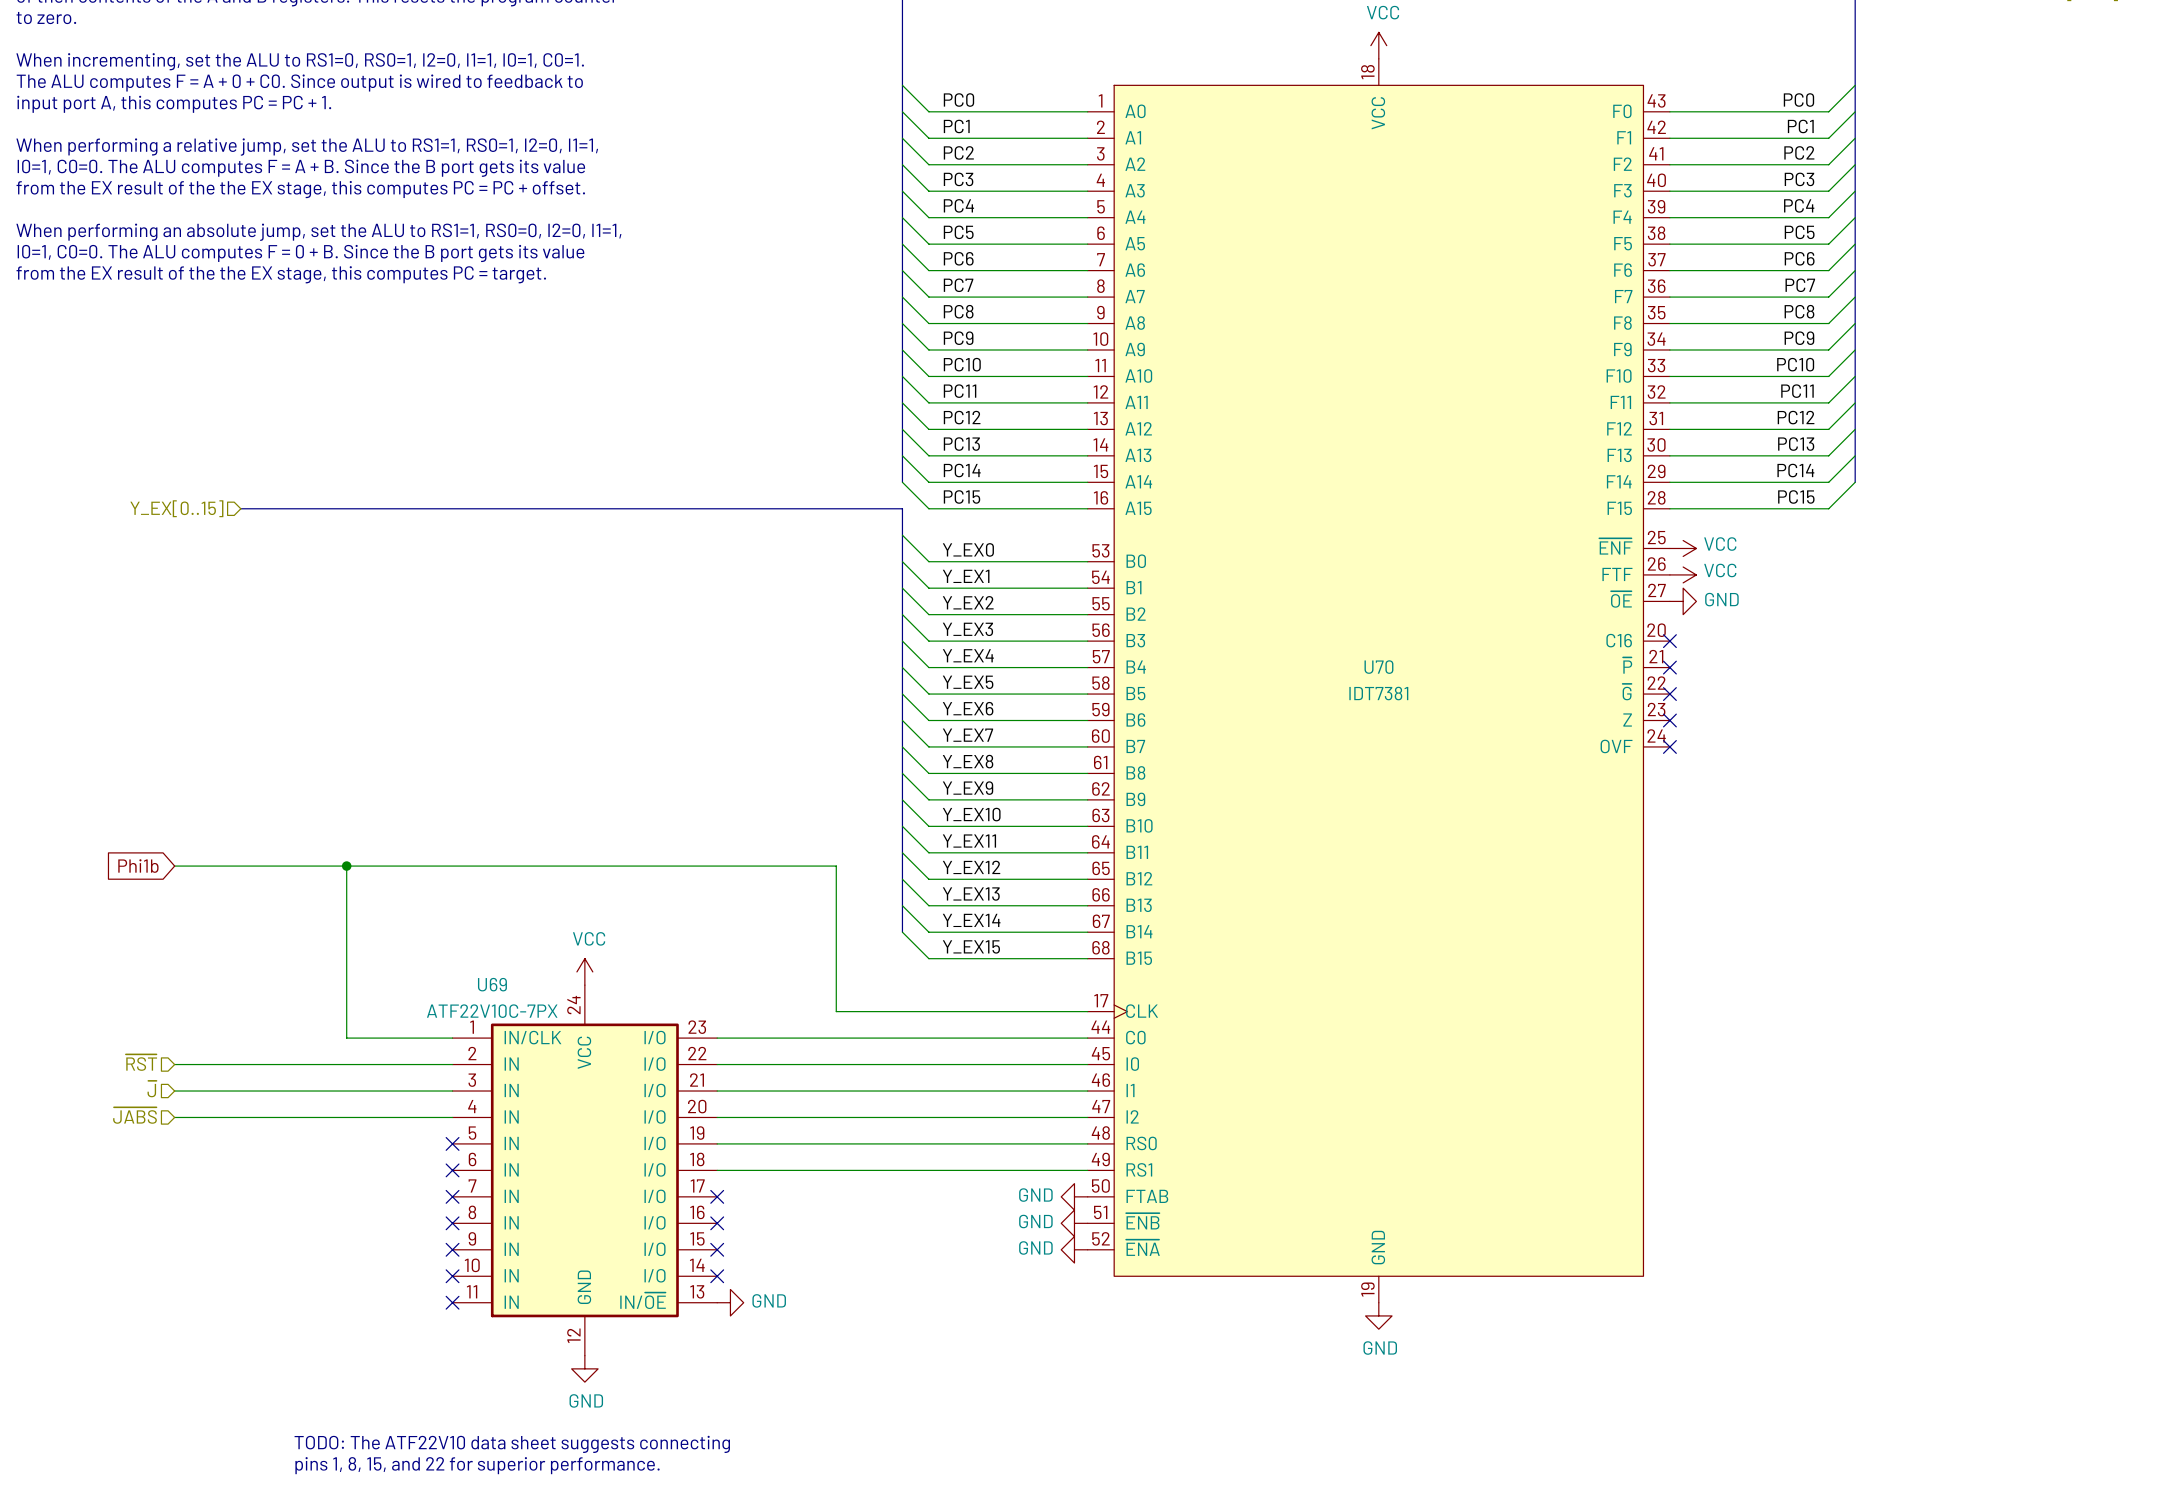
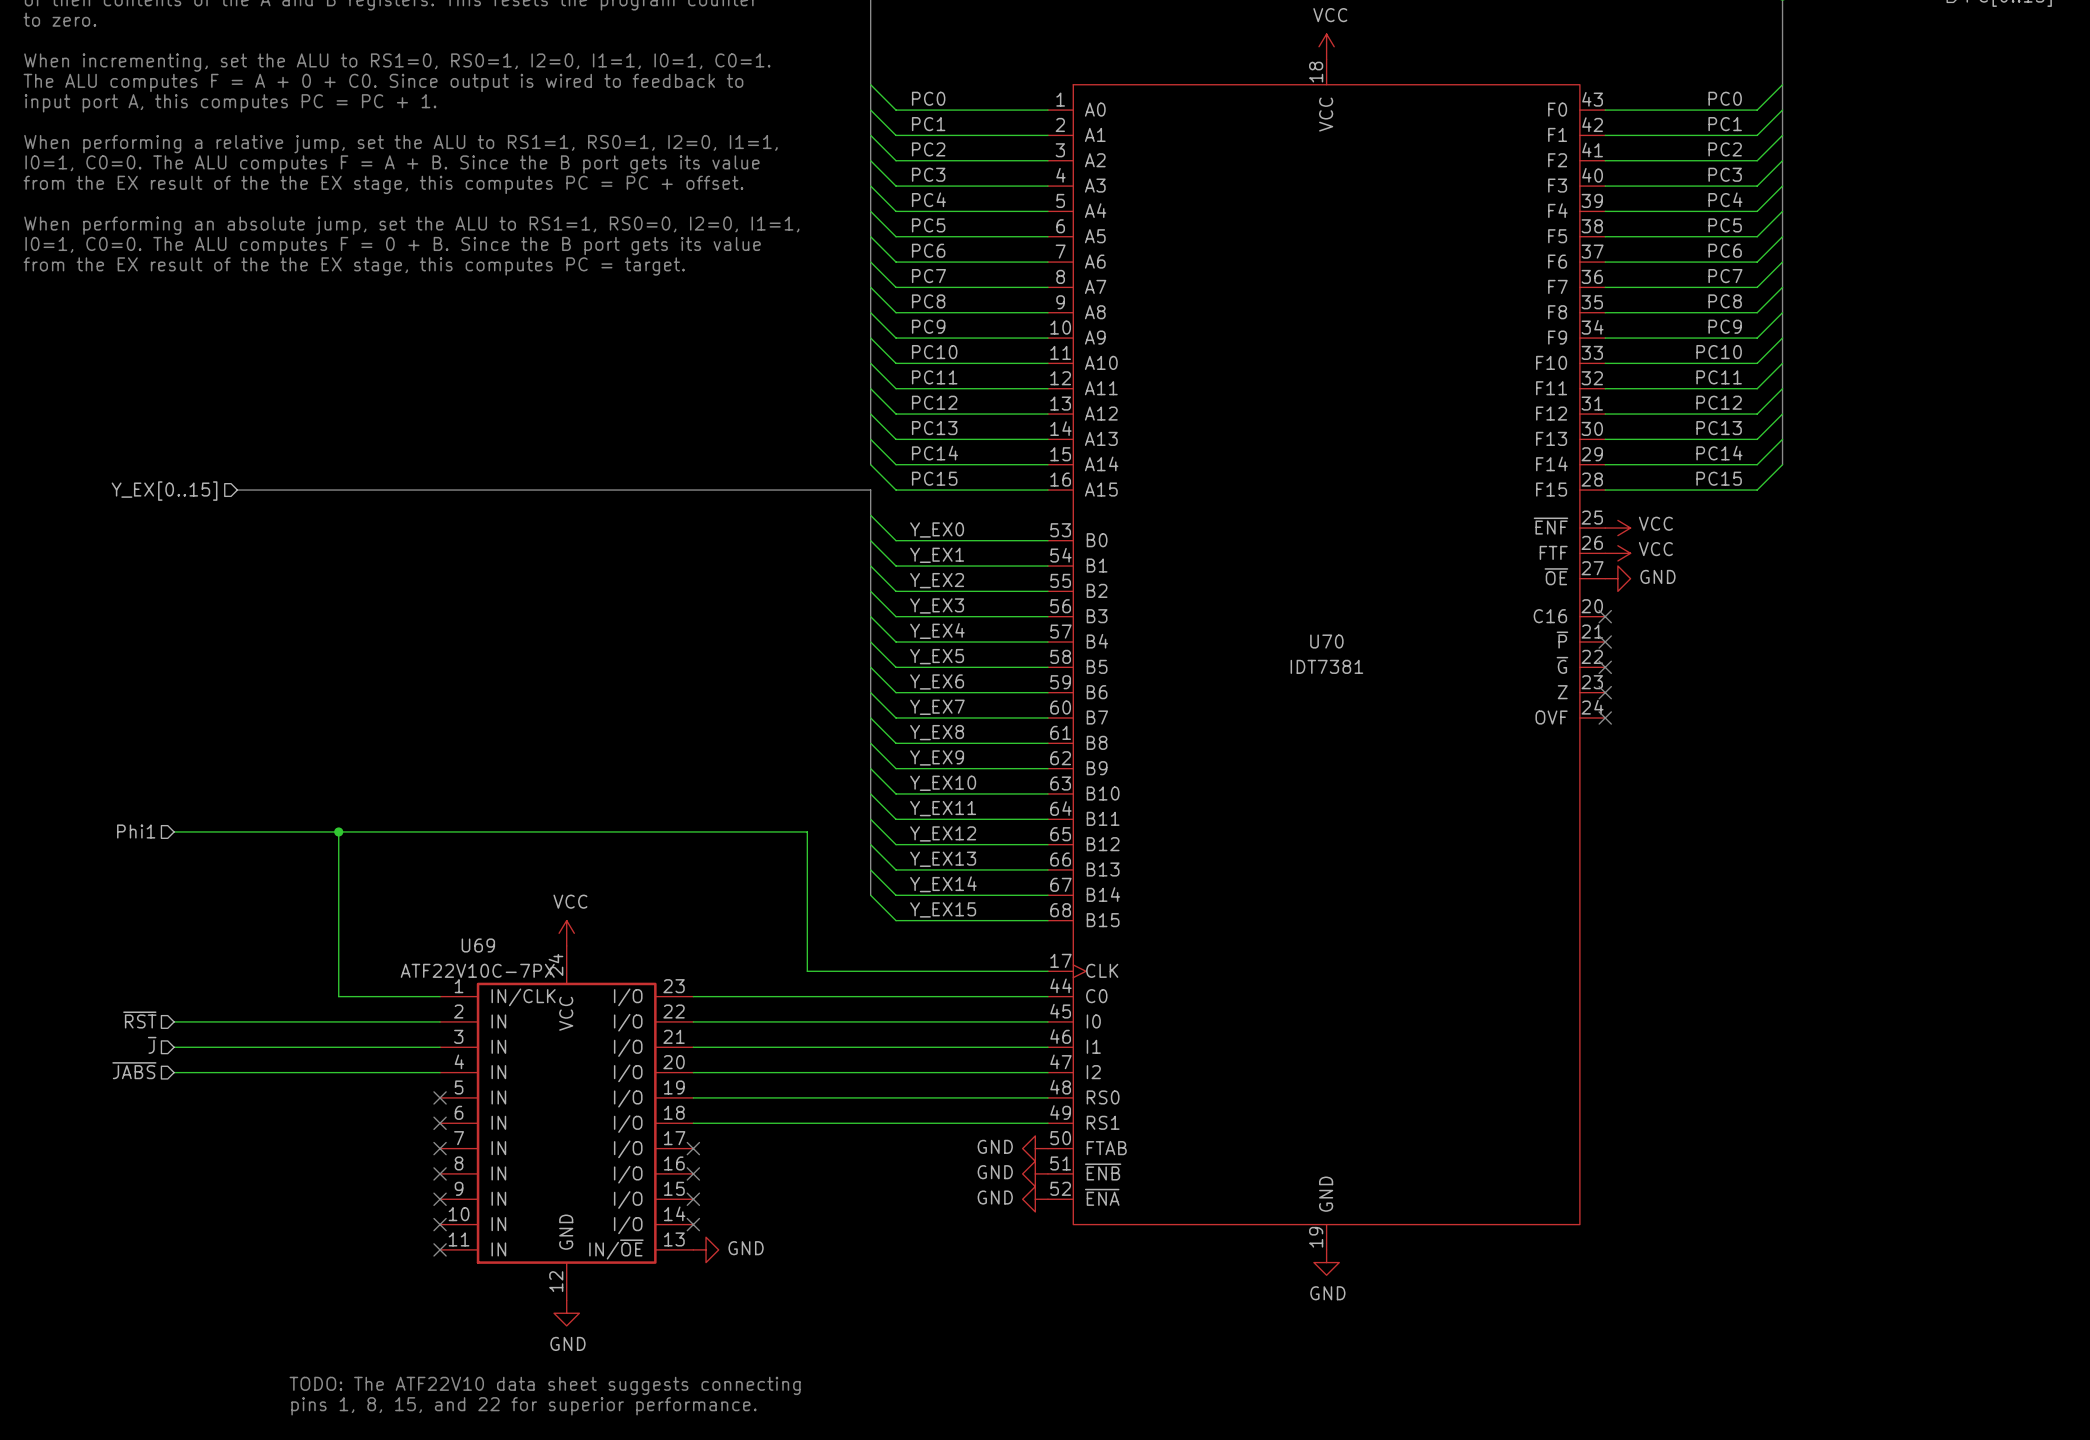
hierarchical label: none -> Phi1 (136, 831)
global label: Phi1b (138, 866) -> none

